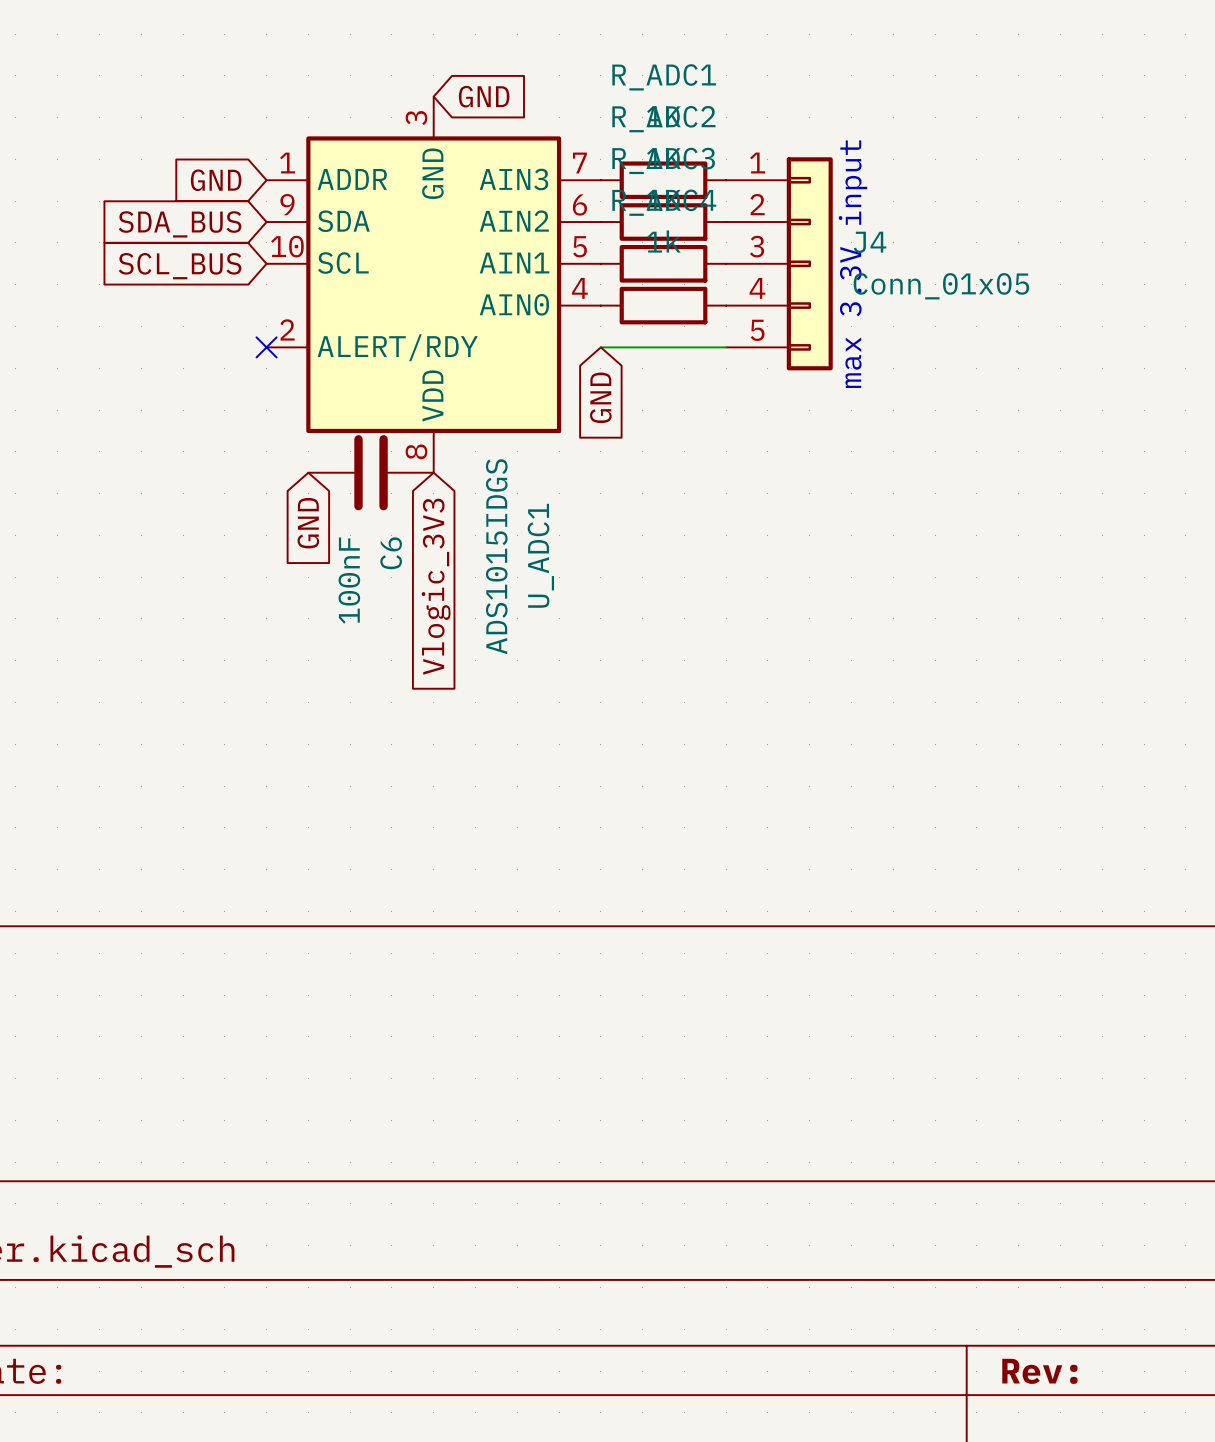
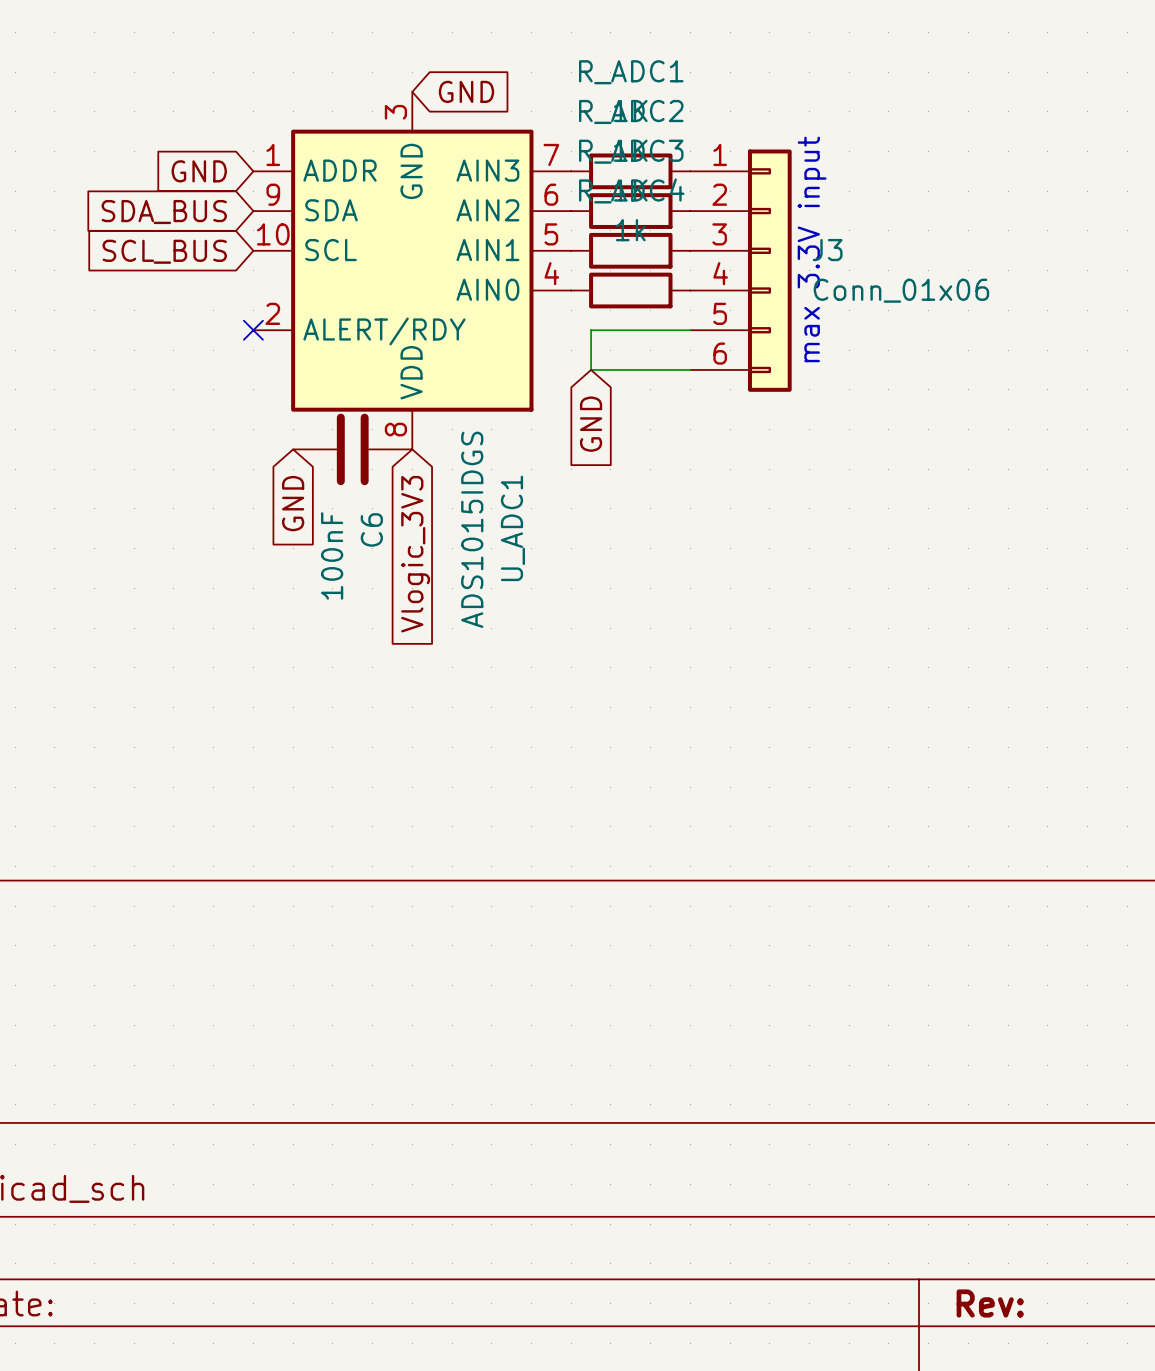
J4: Conn_01x05 (779, 263) -> none
J3: none -> Conn_01x06 (741, 270)
wire: (600, 347) (621, 347) -> (690, 369) (591, 369) (591, 330)
global label position: GND (600, 397) -> GND (591, 424)

